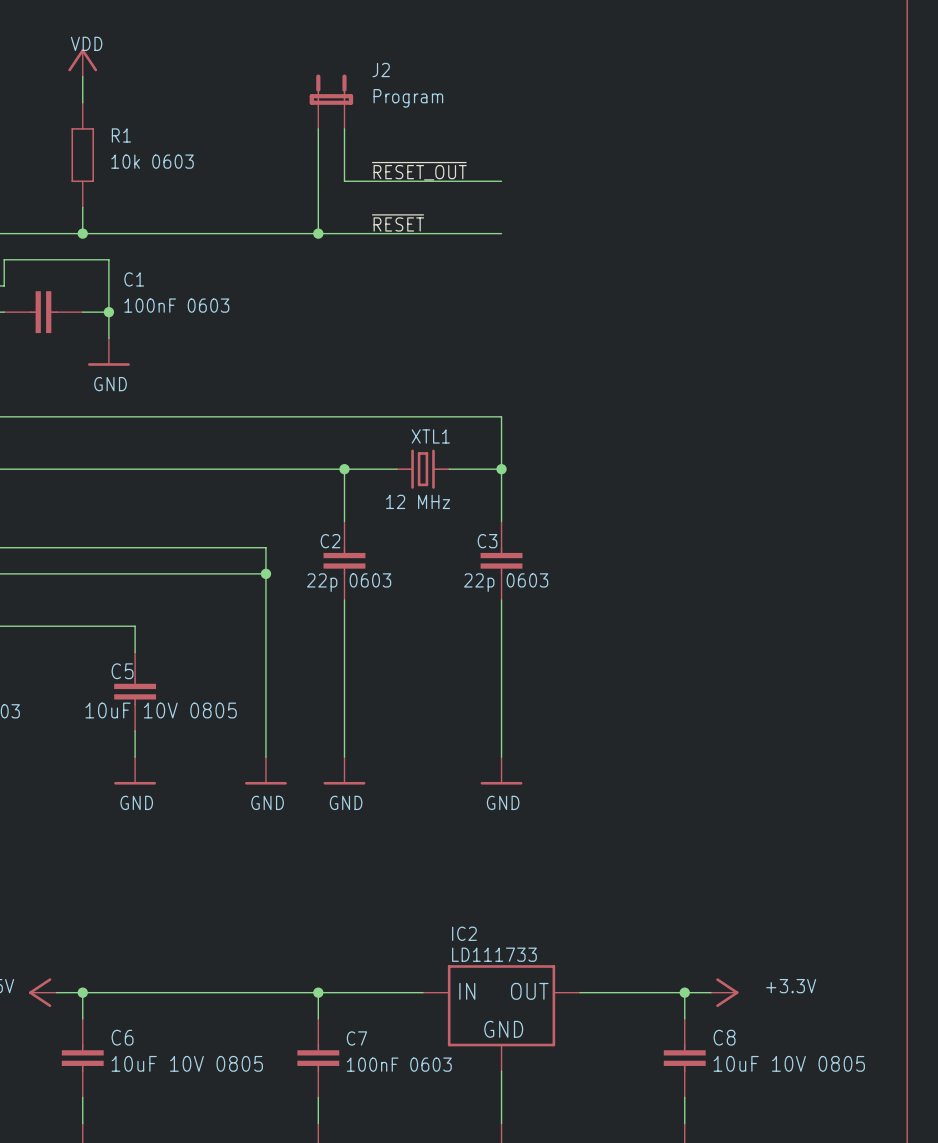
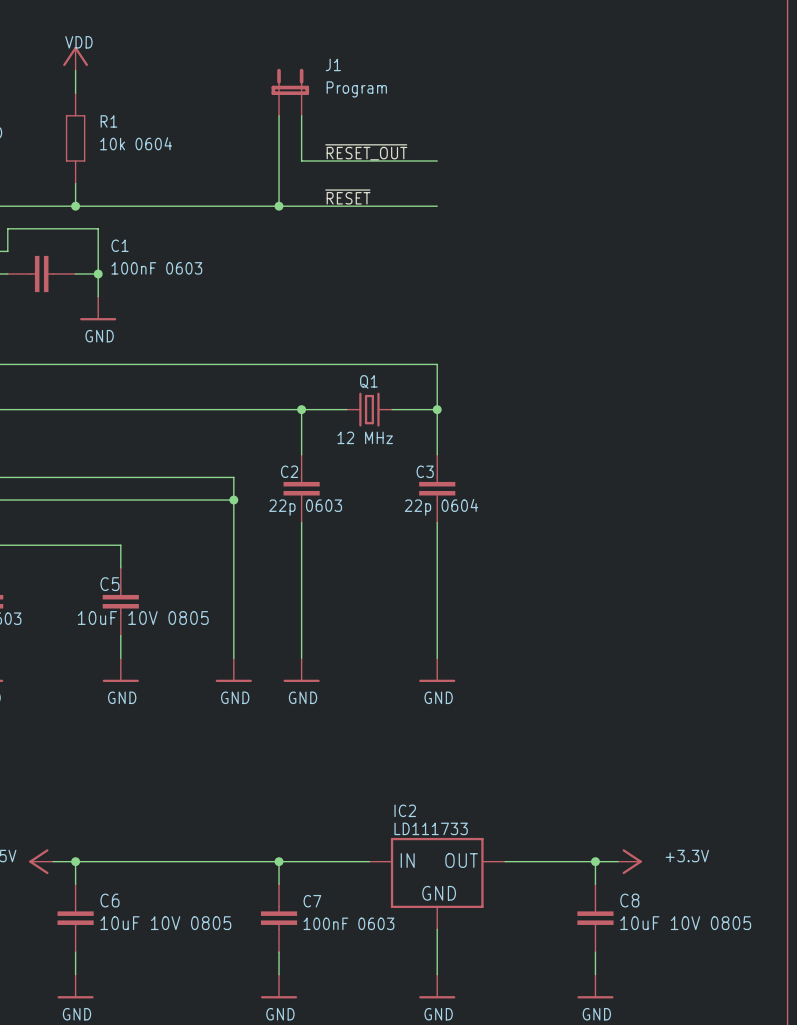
J2 name: J2 (381, 70) -> J1 (333, 64)
R1 value: 10k 0603 (152, 161) -> 10k 0604 (136, 143)
XTL1 name: XTL1 (430, 436) -> Q1 (368, 381)
C3 value: 22p 0603 (506, 582) -> 22p 0604 (441, 507)

